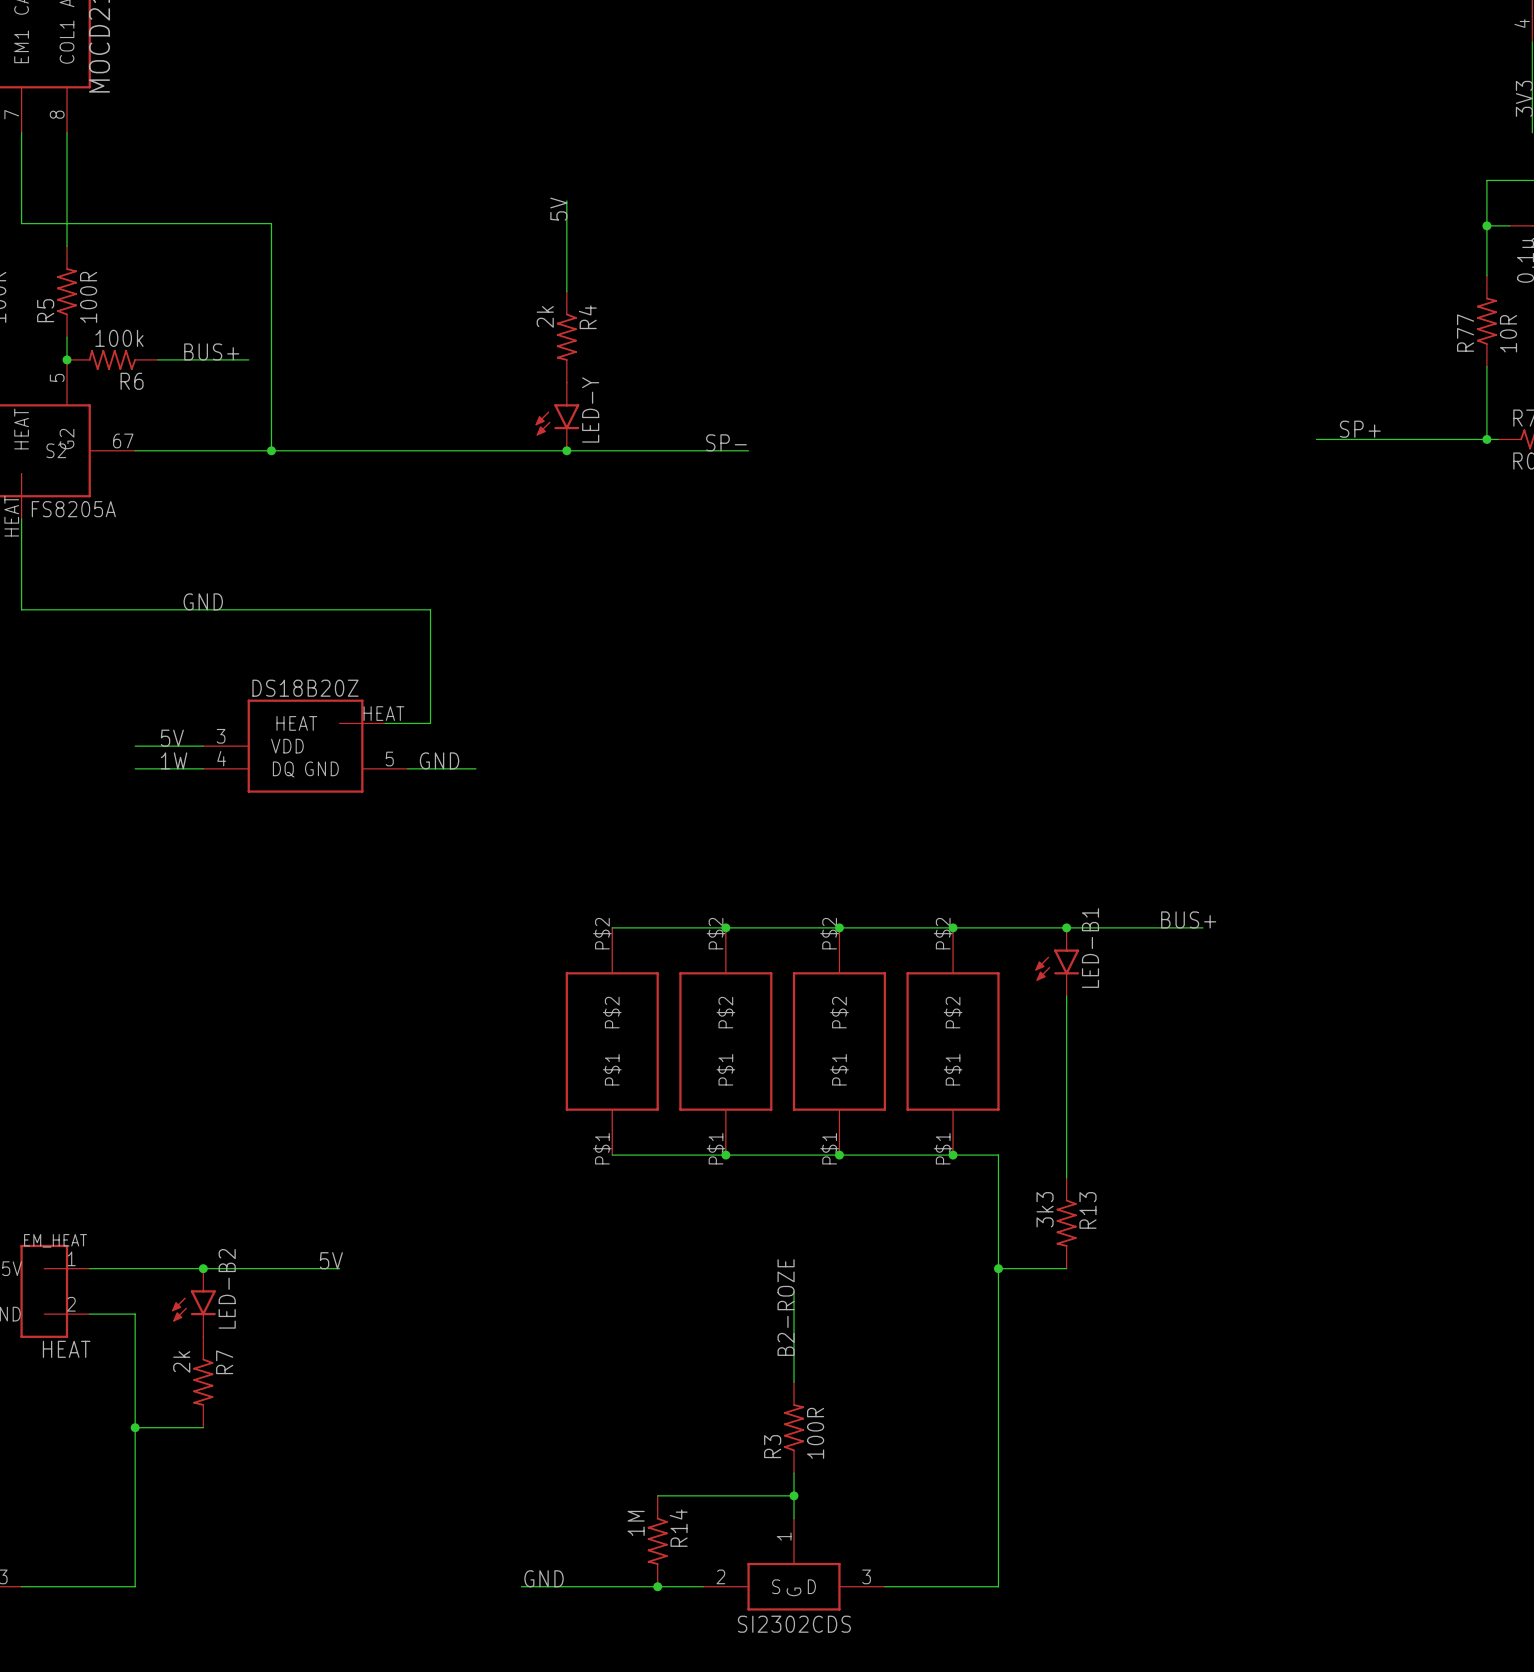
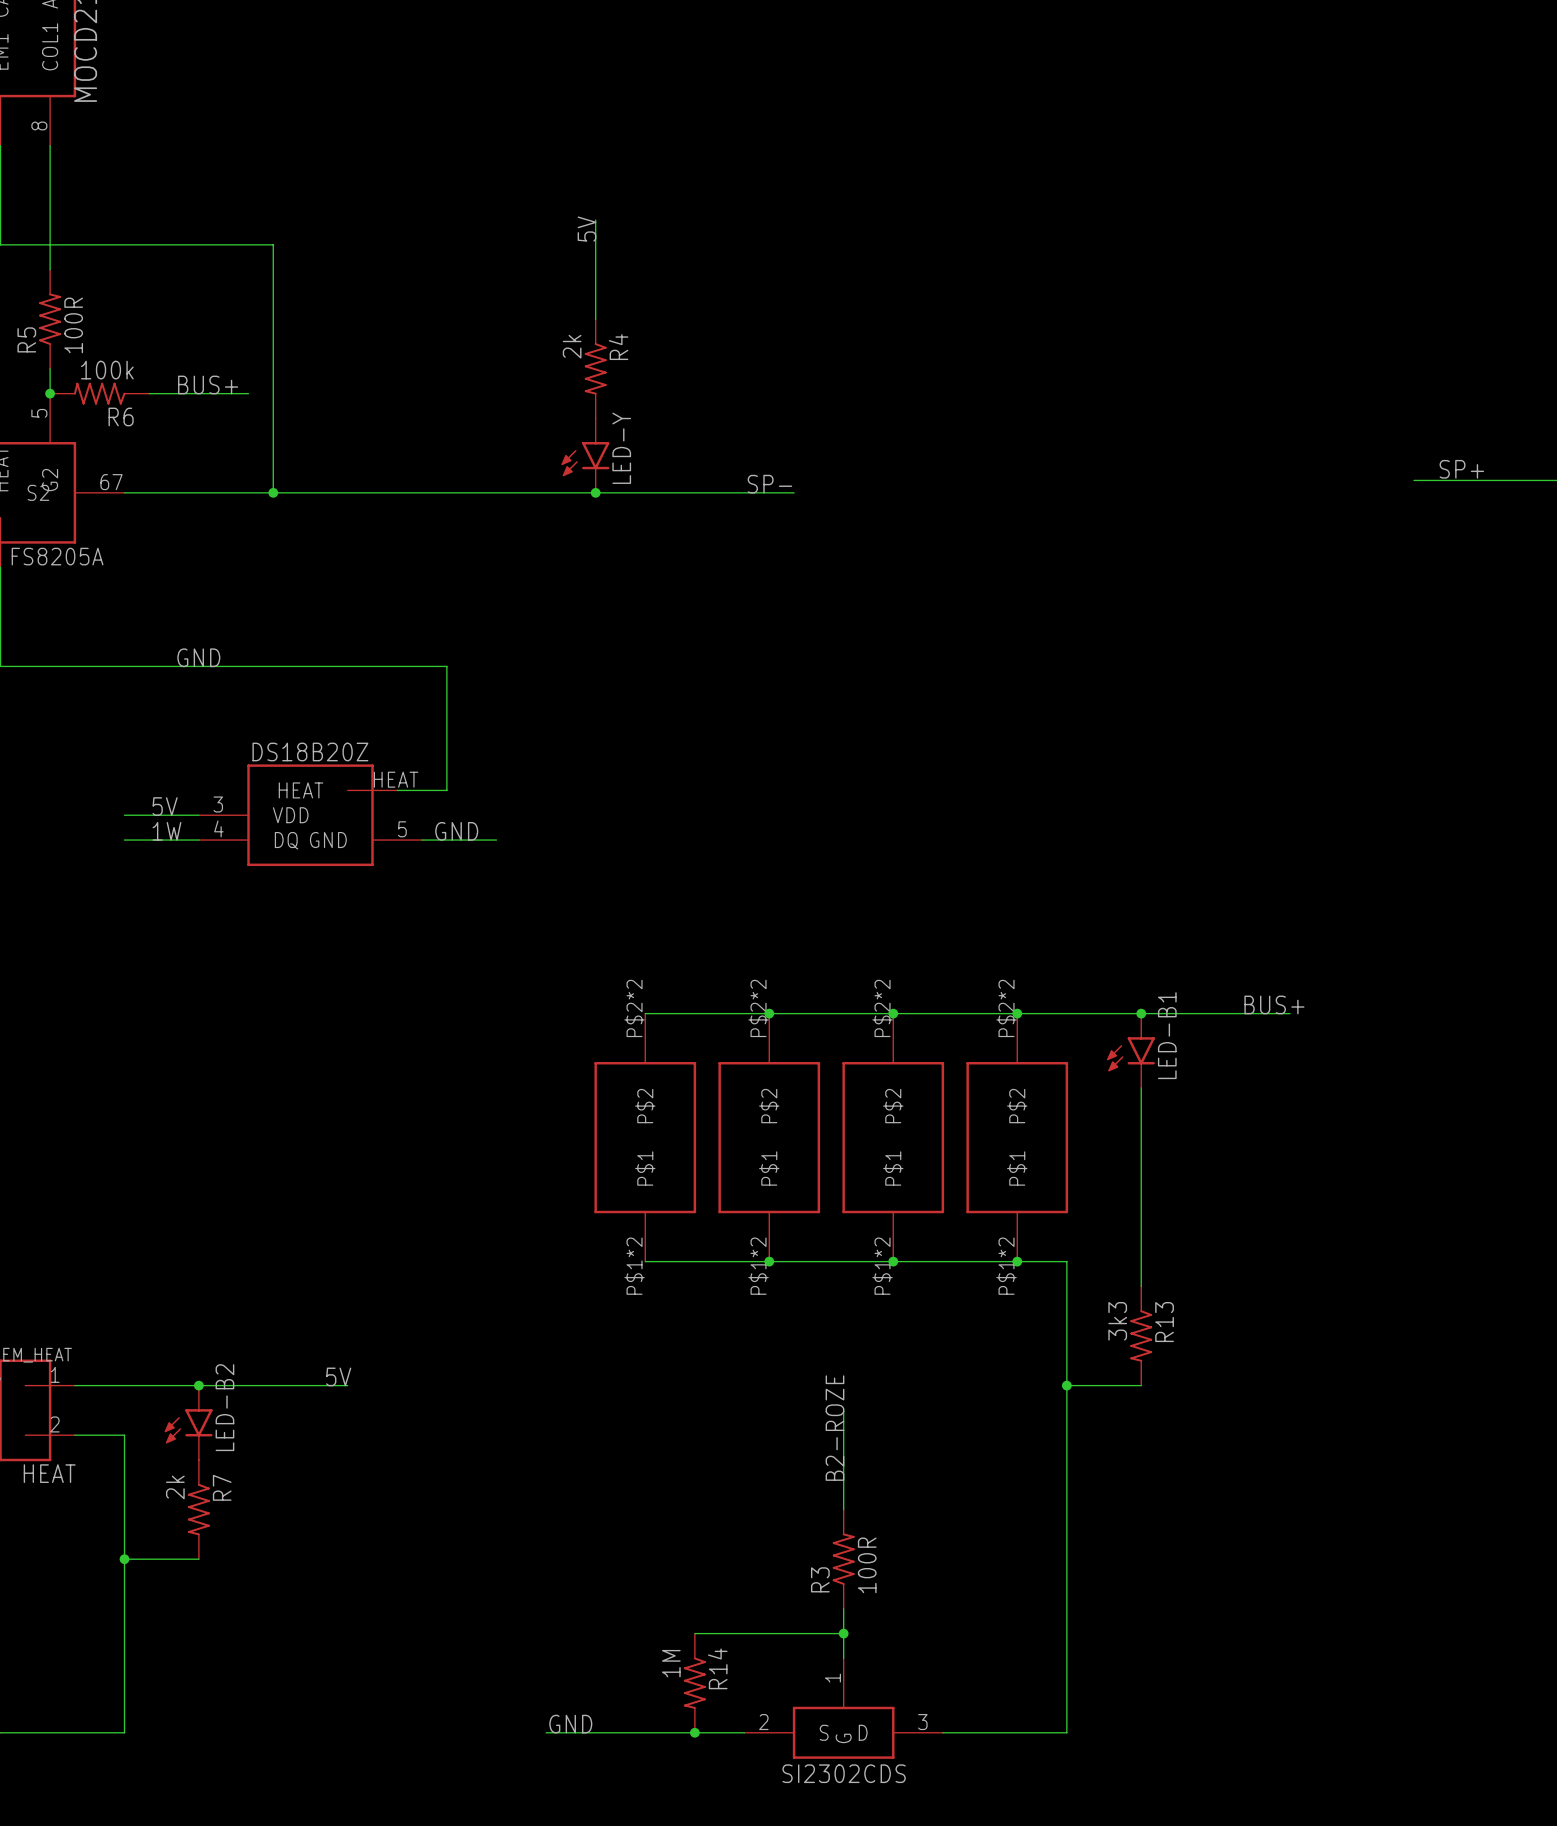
part pin number: P$2 (602, 933) -> P$2*2 (634, 1008)
part pin number: P$2 (716, 933) -> P$2*2 (758, 1008)
part pin number: P$2 (829, 933) -> P$2*2 (882, 1008)
part pin number: P$2 (943, 933) -> P$2*2 (1006, 1008)
part pin number: P$1 (602, 1148) -> P$1*2 (634, 1266)
part pin number: P$1 (716, 1148) -> P$1*2 (758, 1266)
part pin number: P$1 (829, 1148) -> P$1*2 (882, 1266)
part pin number: P$1 (943, 1148) -> P$1*2 (1006, 1266)

